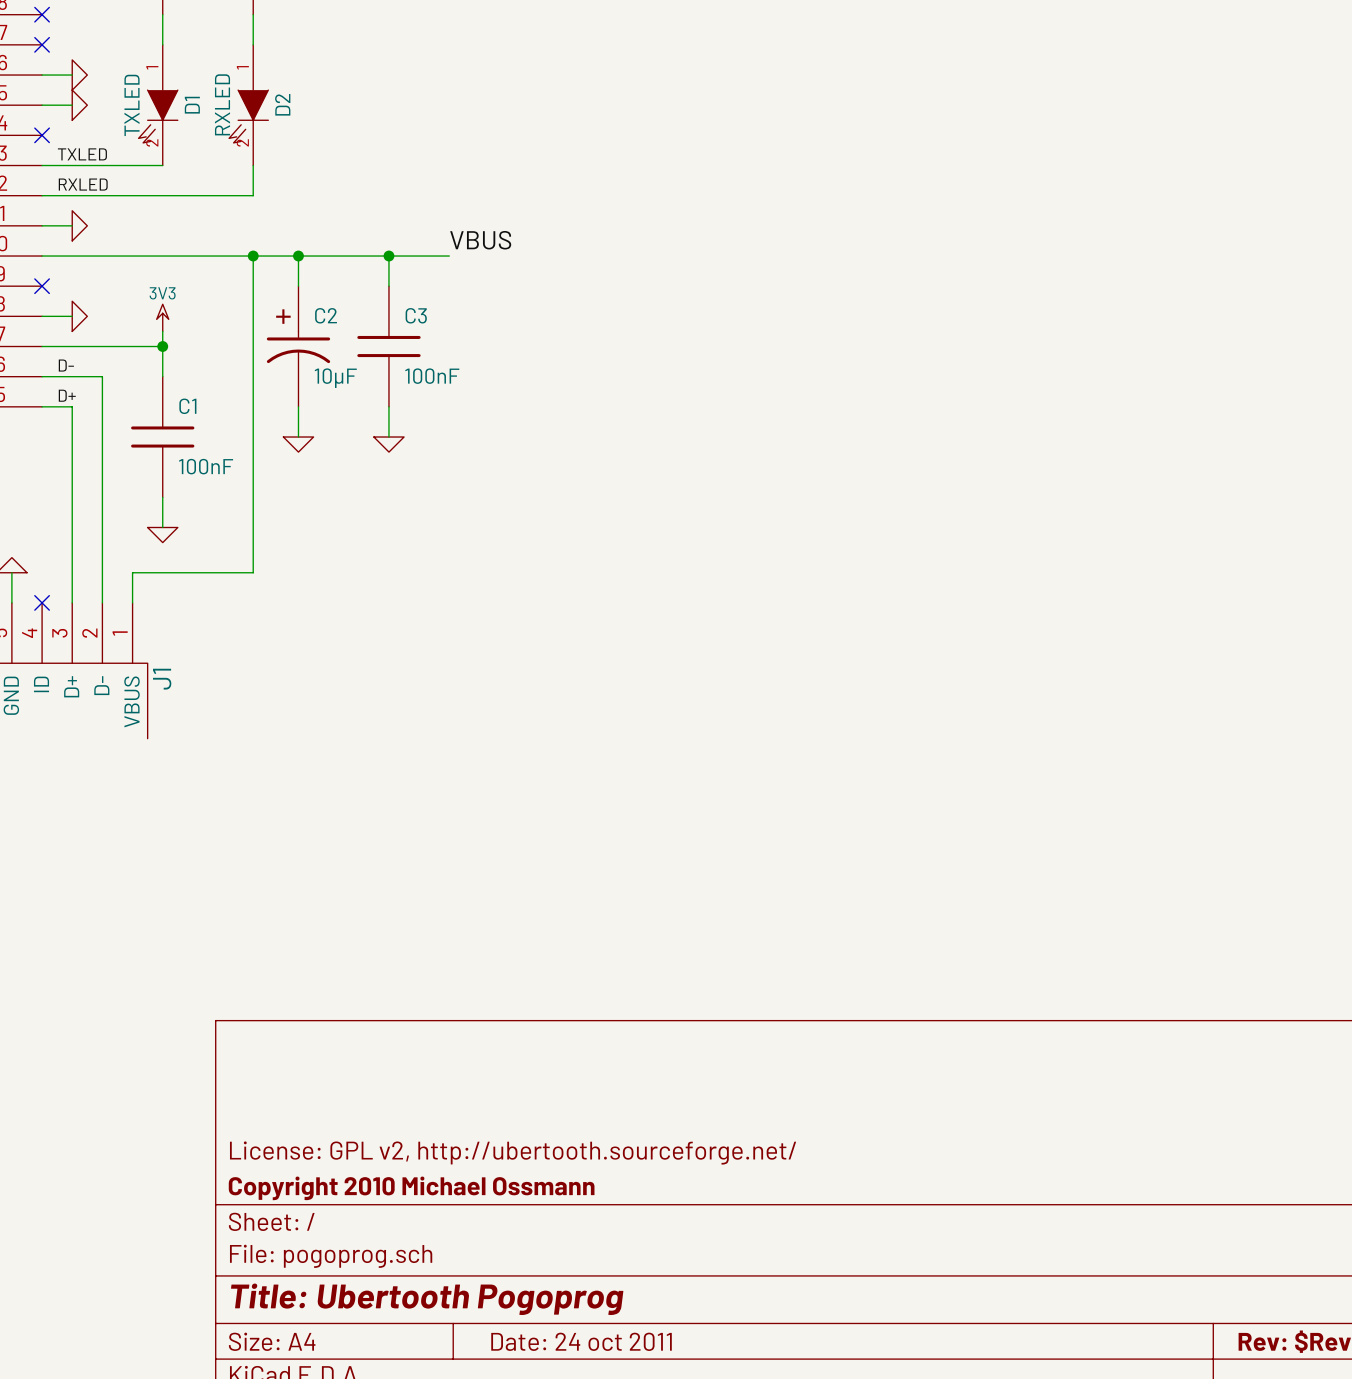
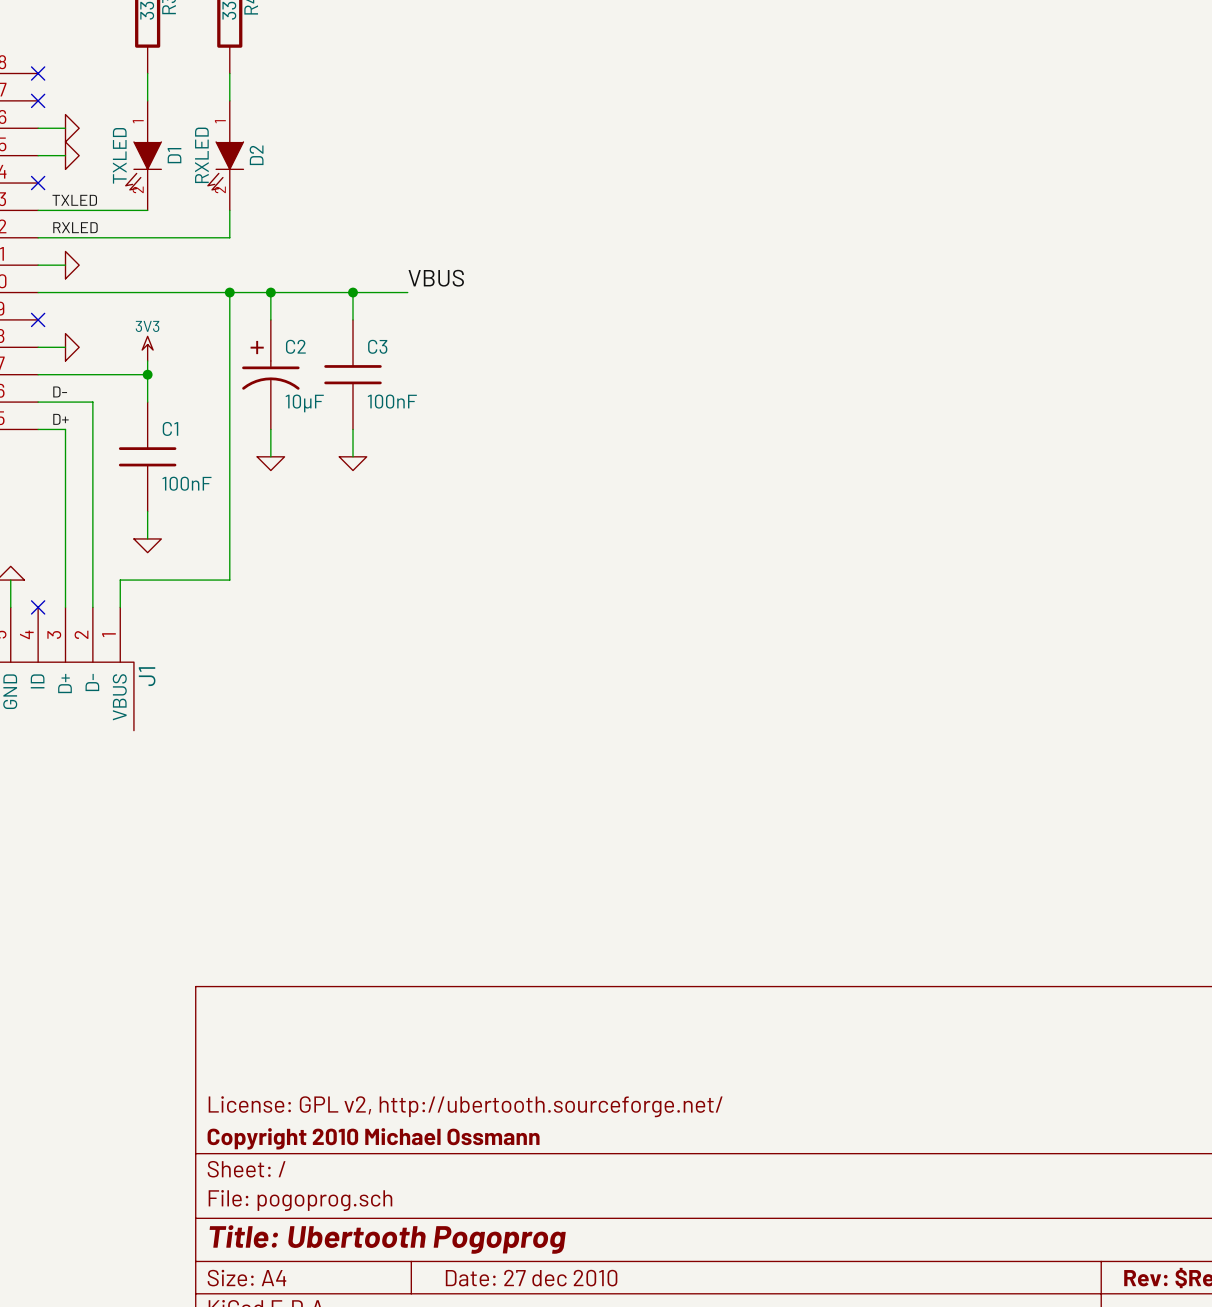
title block: Date: 24 oct 2011 (581, 1341) -> Date: 27 dec 2010 (531, 1278)

